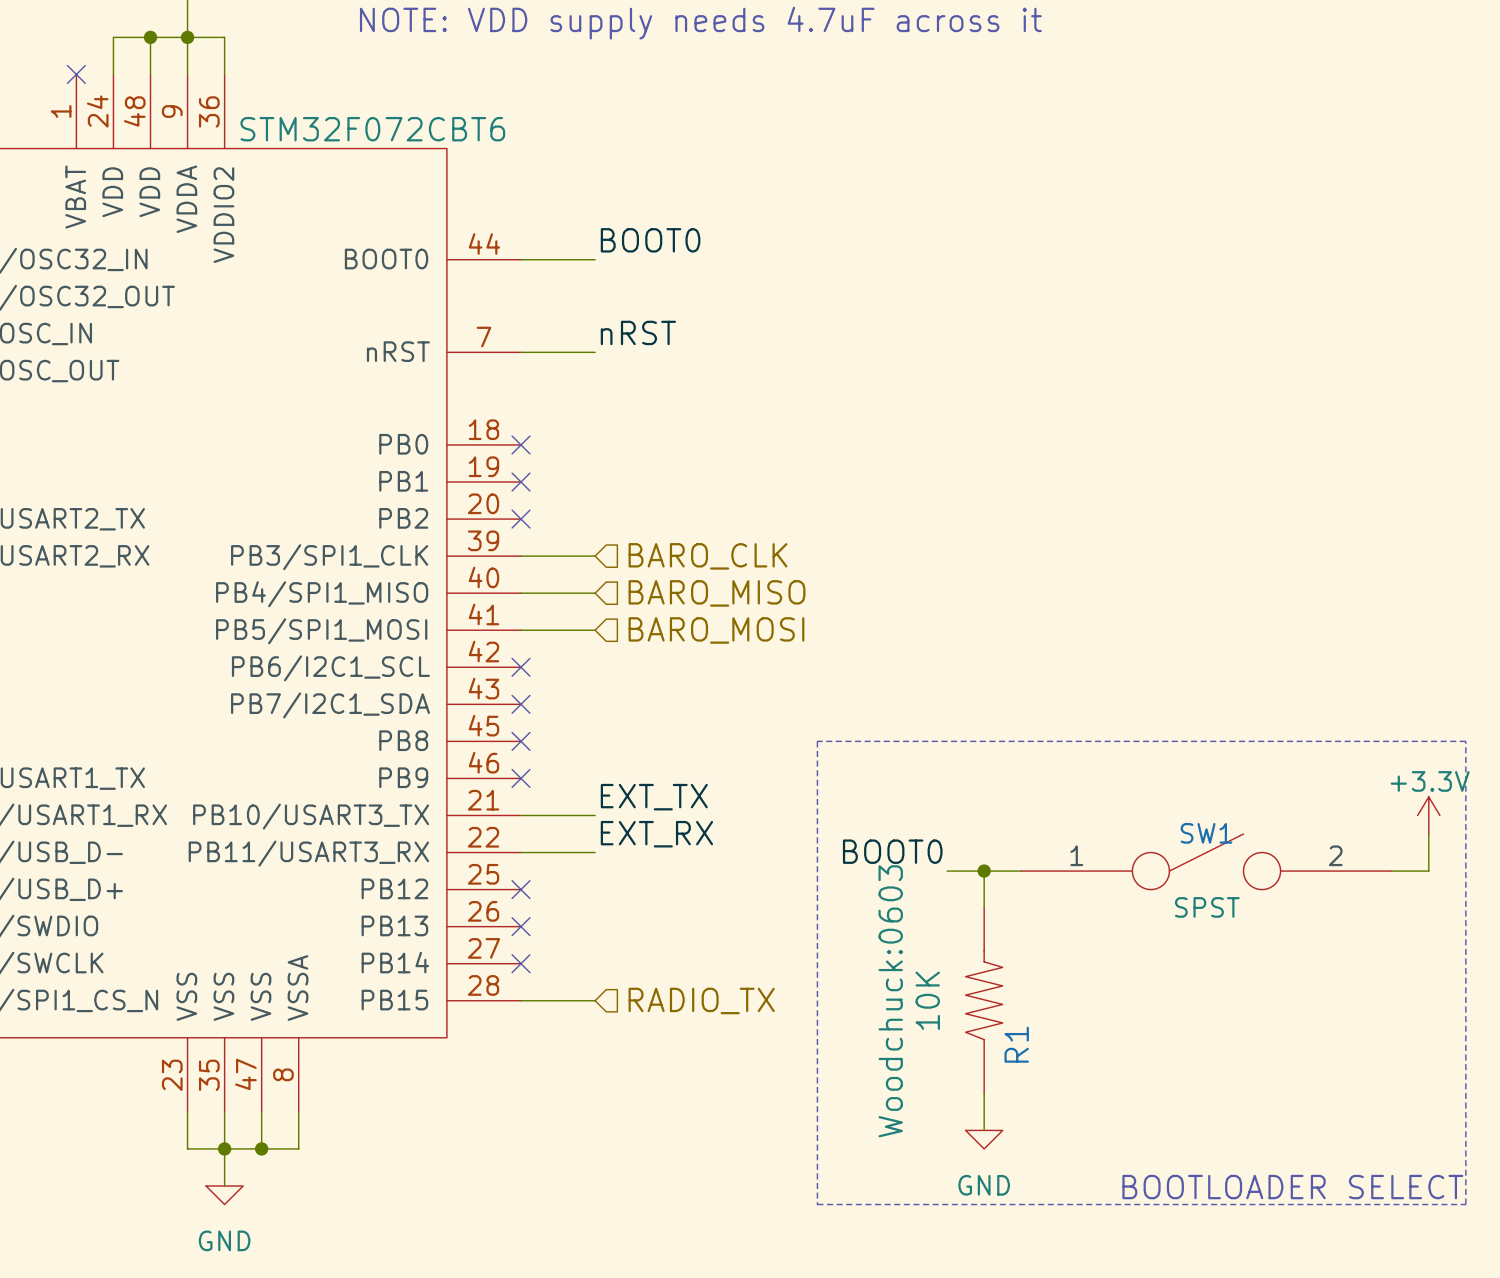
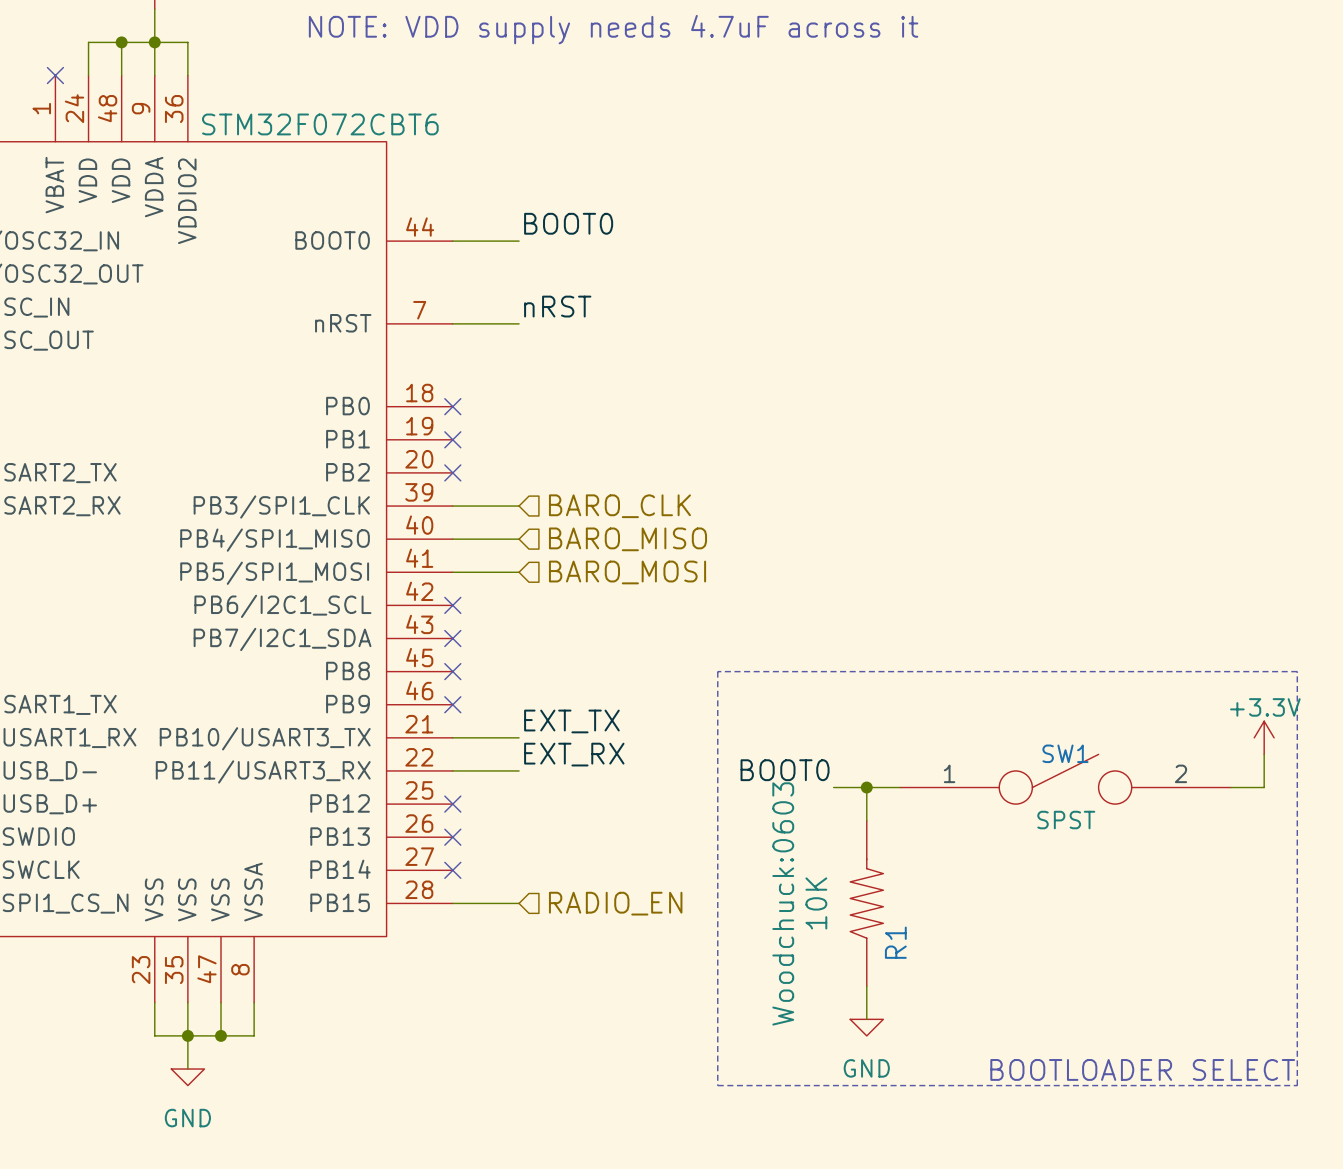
hierarchical label: RADIO_TX (701, 1000) -> RADIO_EN (615, 903)

